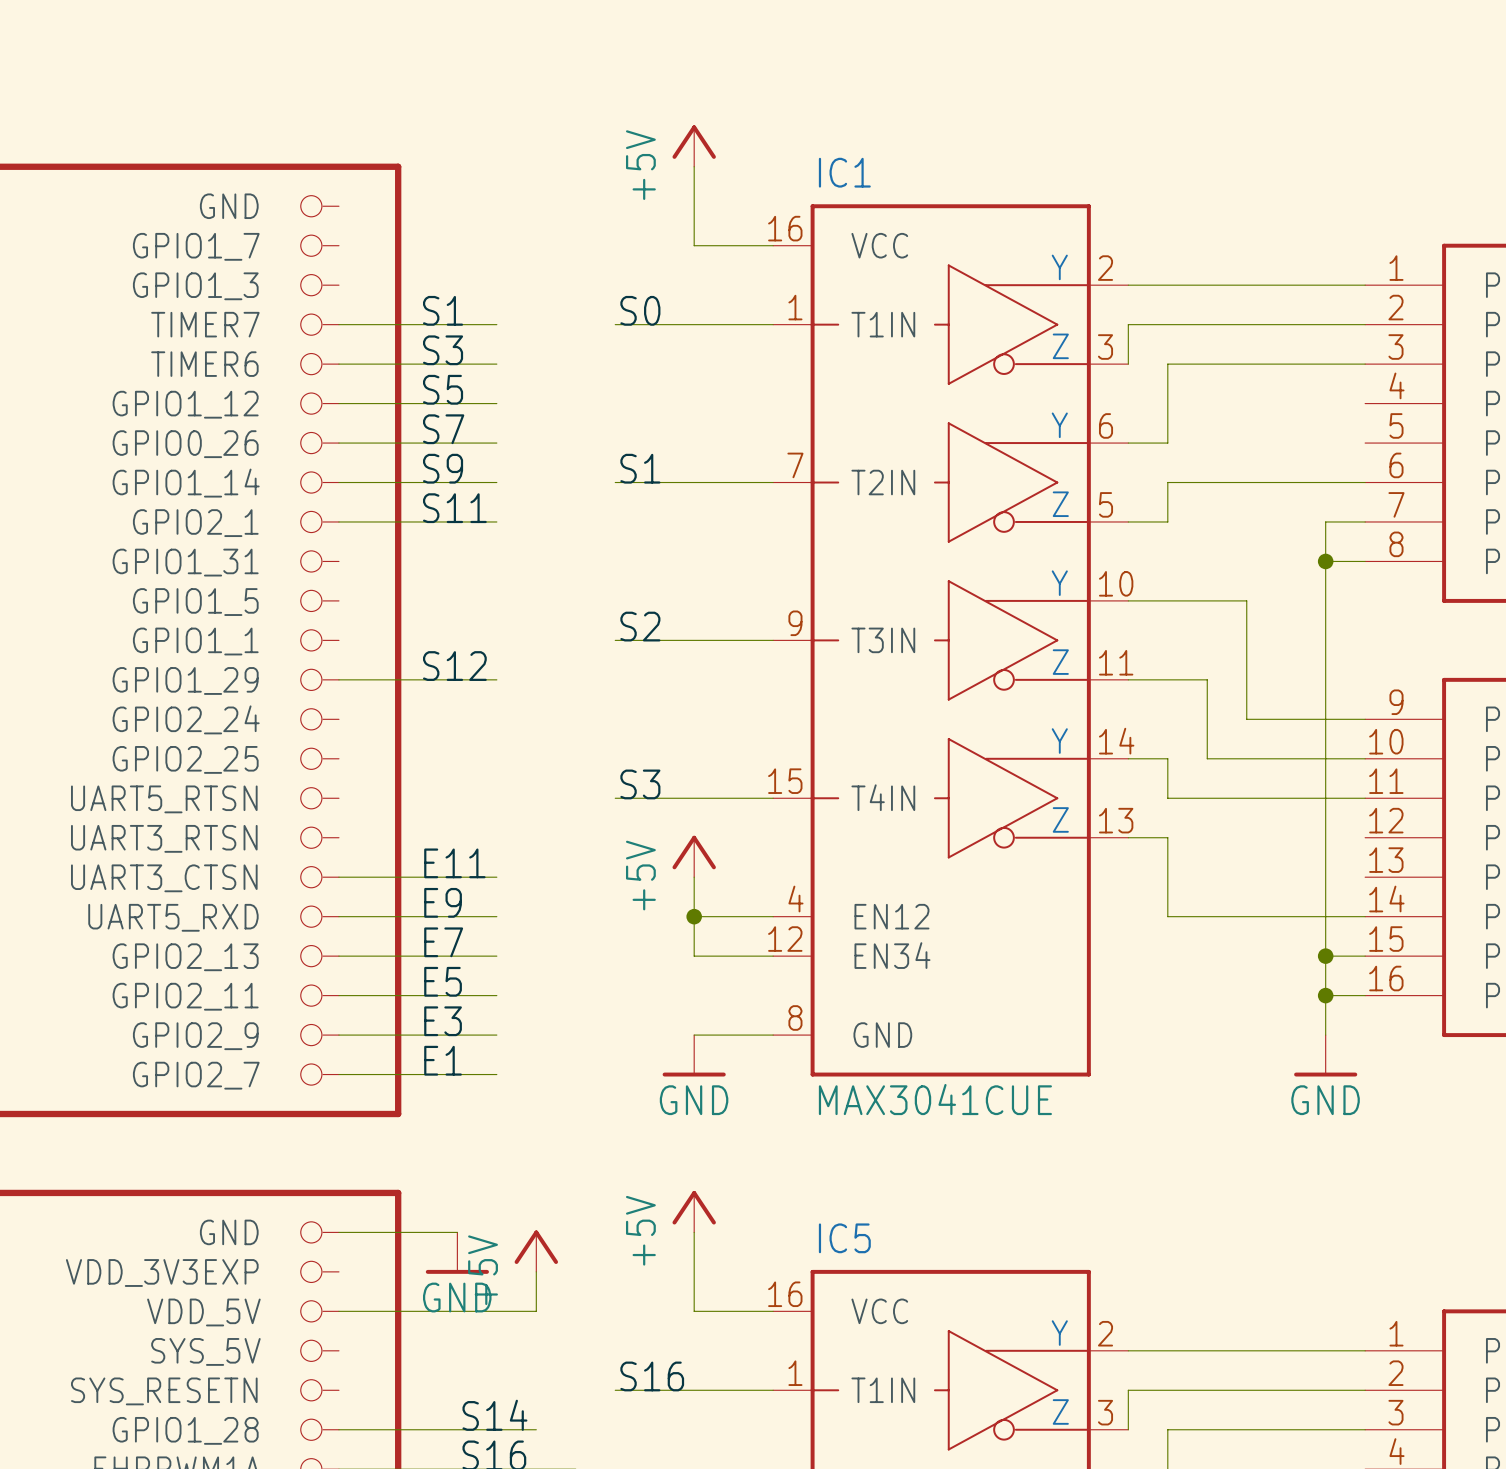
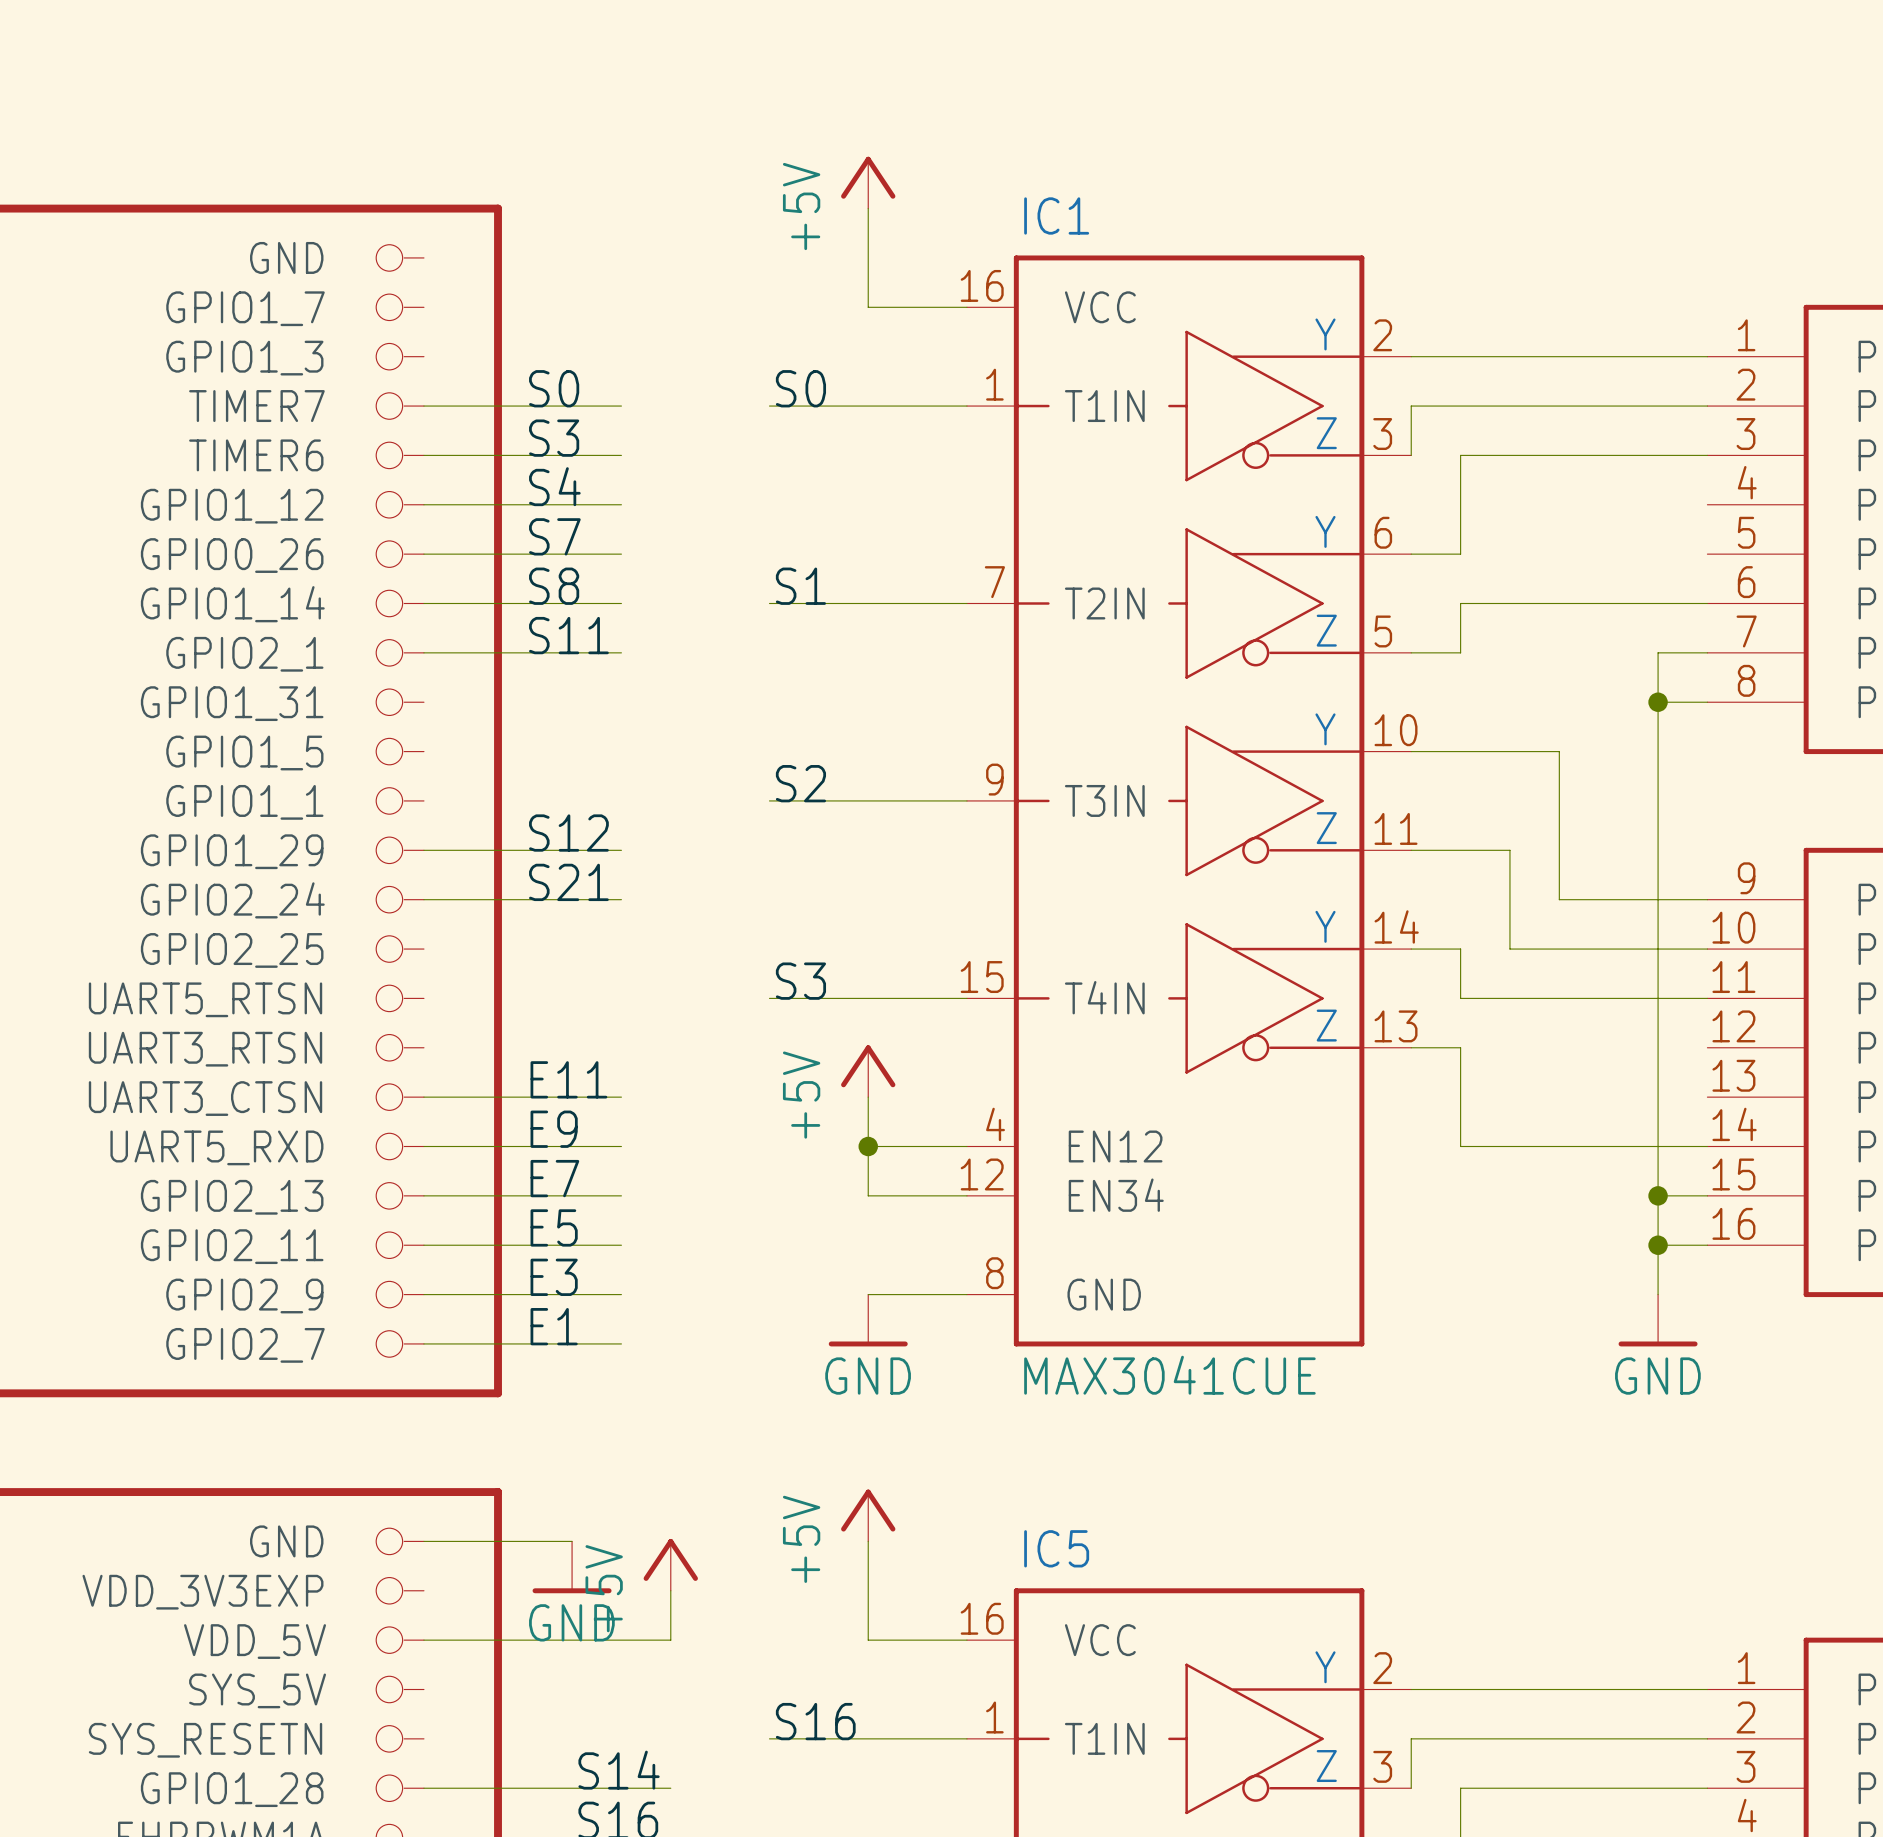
label: S1 (443, 310) -> S0 (554, 388)
label: S5 (443, 389) -> S4 (554, 486)
label: S9 (443, 468) -> S8 (554, 586)
label: none -> S21 (568, 882)
wire: none -> (423, 899) (621, 899)

